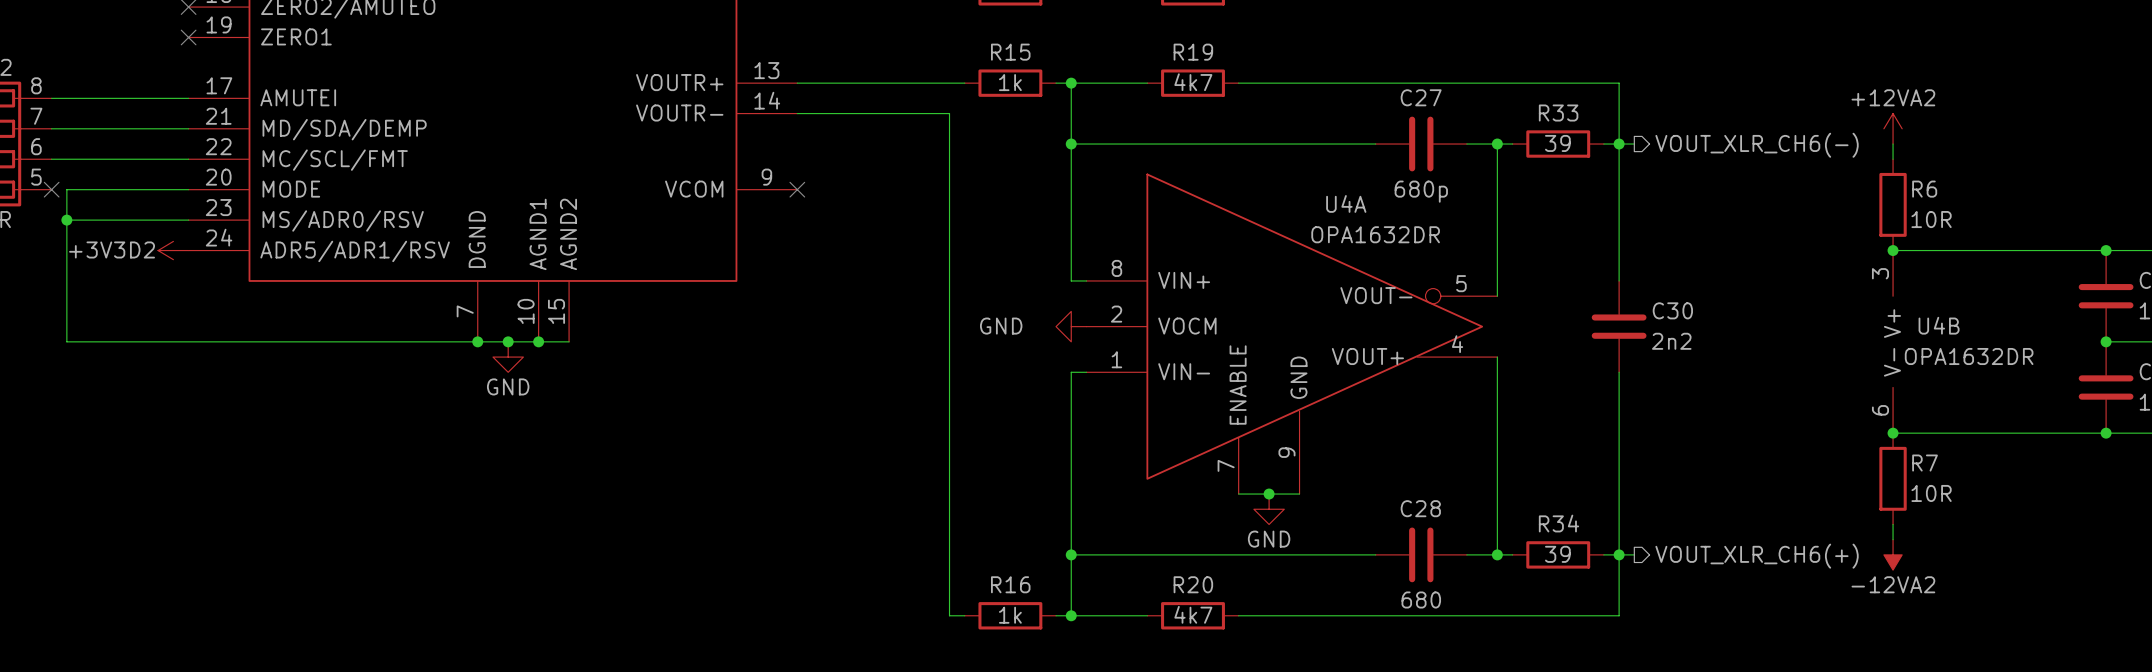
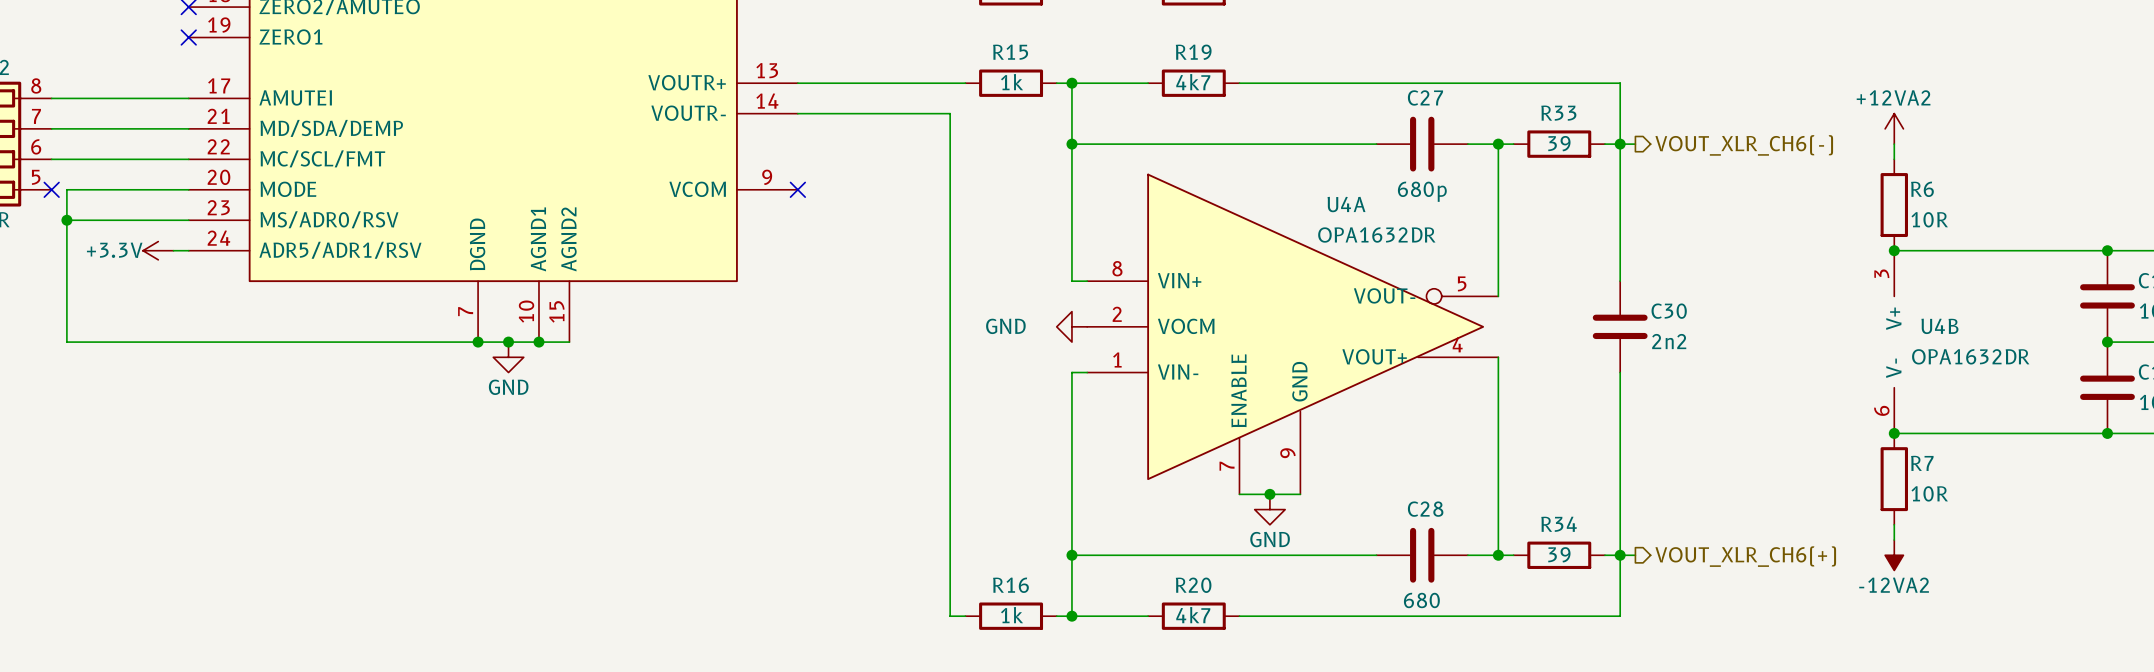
power symbol: none -> +3.3V (158, 250)
power symbol: +3V3D2 (173, 250) -> none

